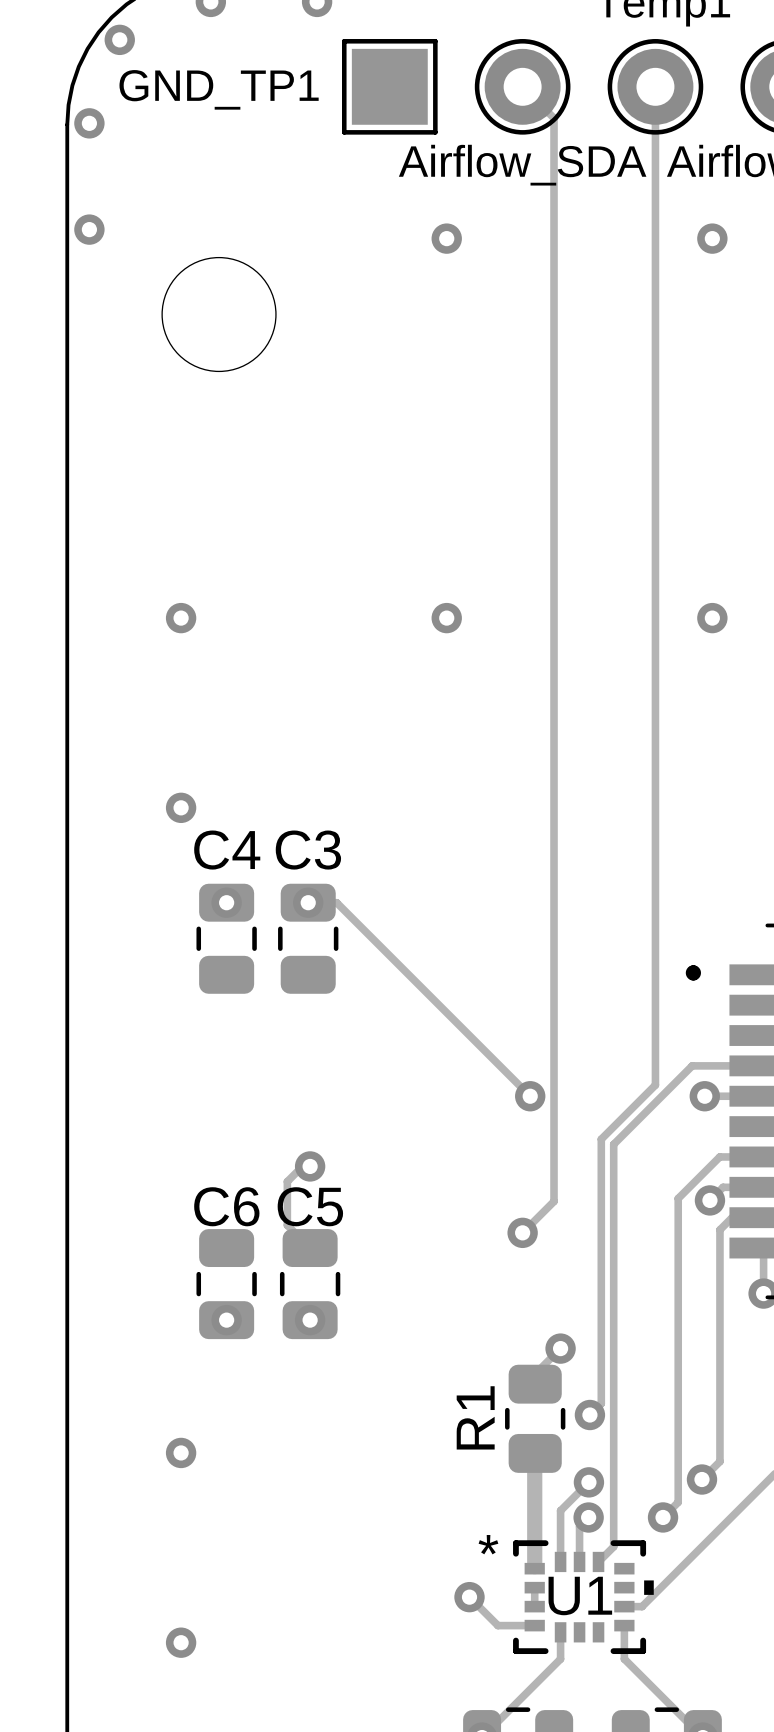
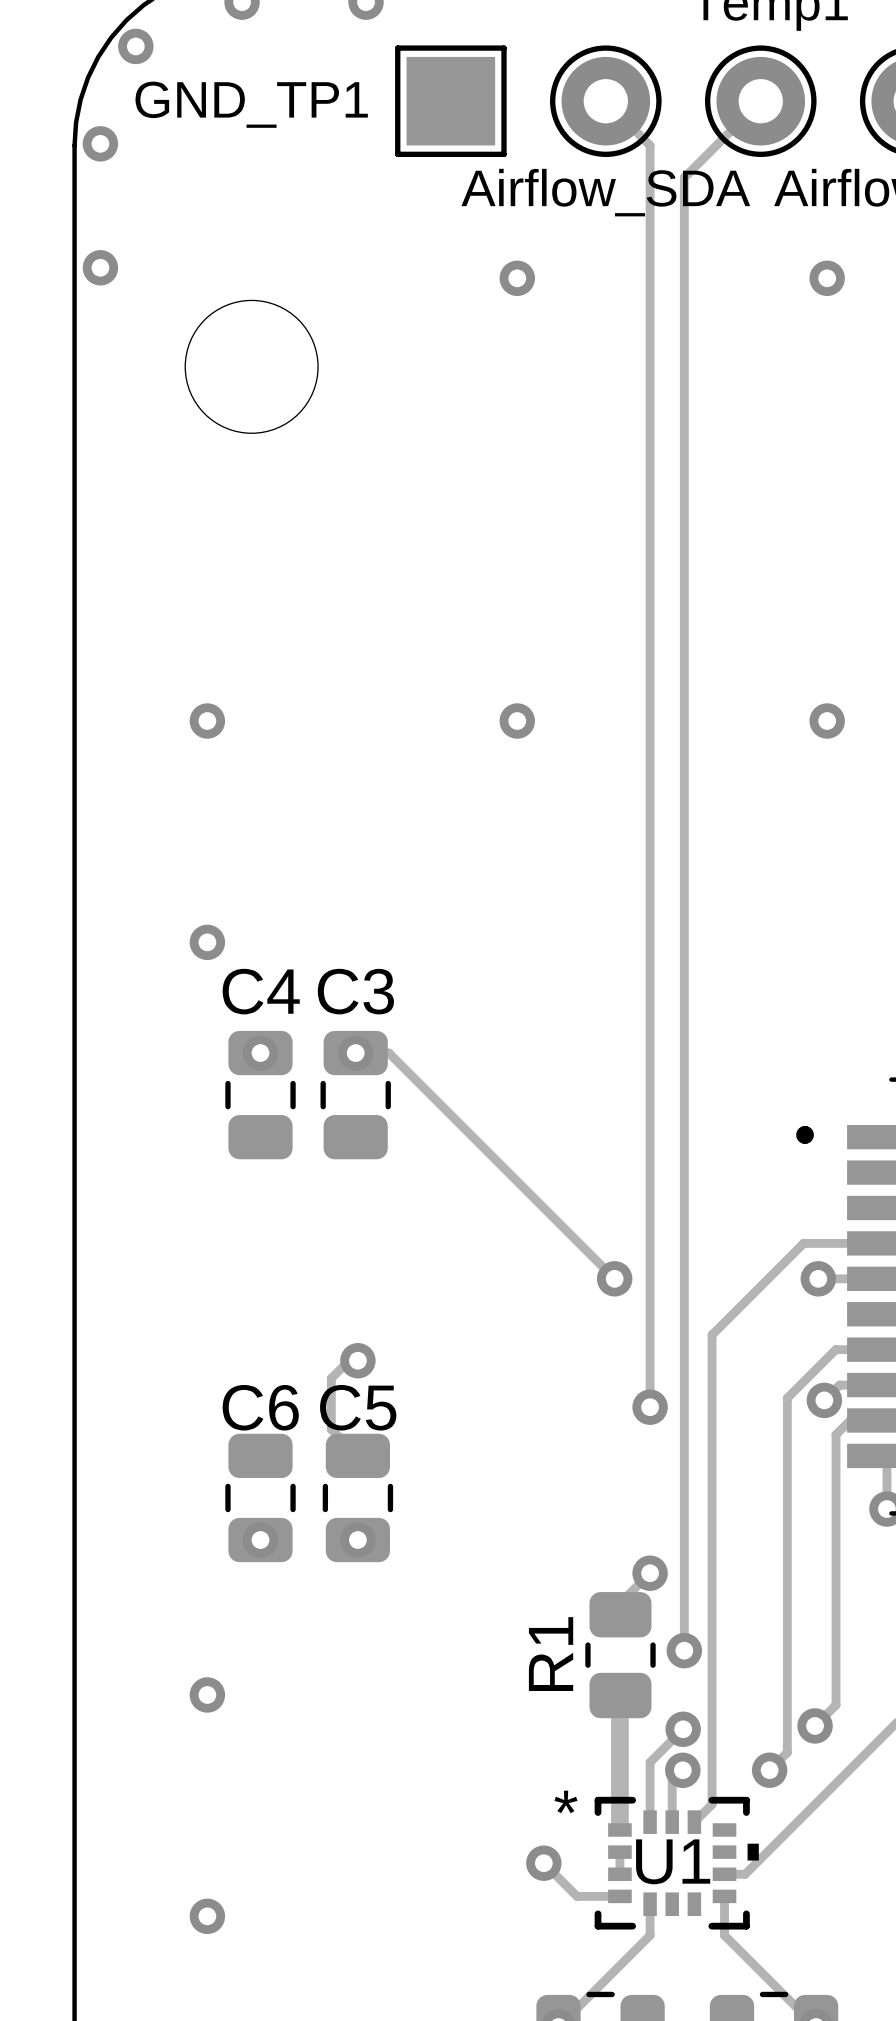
track: (655, 86) (655, 1085) (601, 1139) (601, 1403) (589, 1415) -> (760, 101) (684, 177) (684, 1650)
track: (554, 118) (554, 1201) (522, 1232) -> (642, 137) (650, 145) (650, 1407)
via position: (522, 1232) -> (650, 1407)

